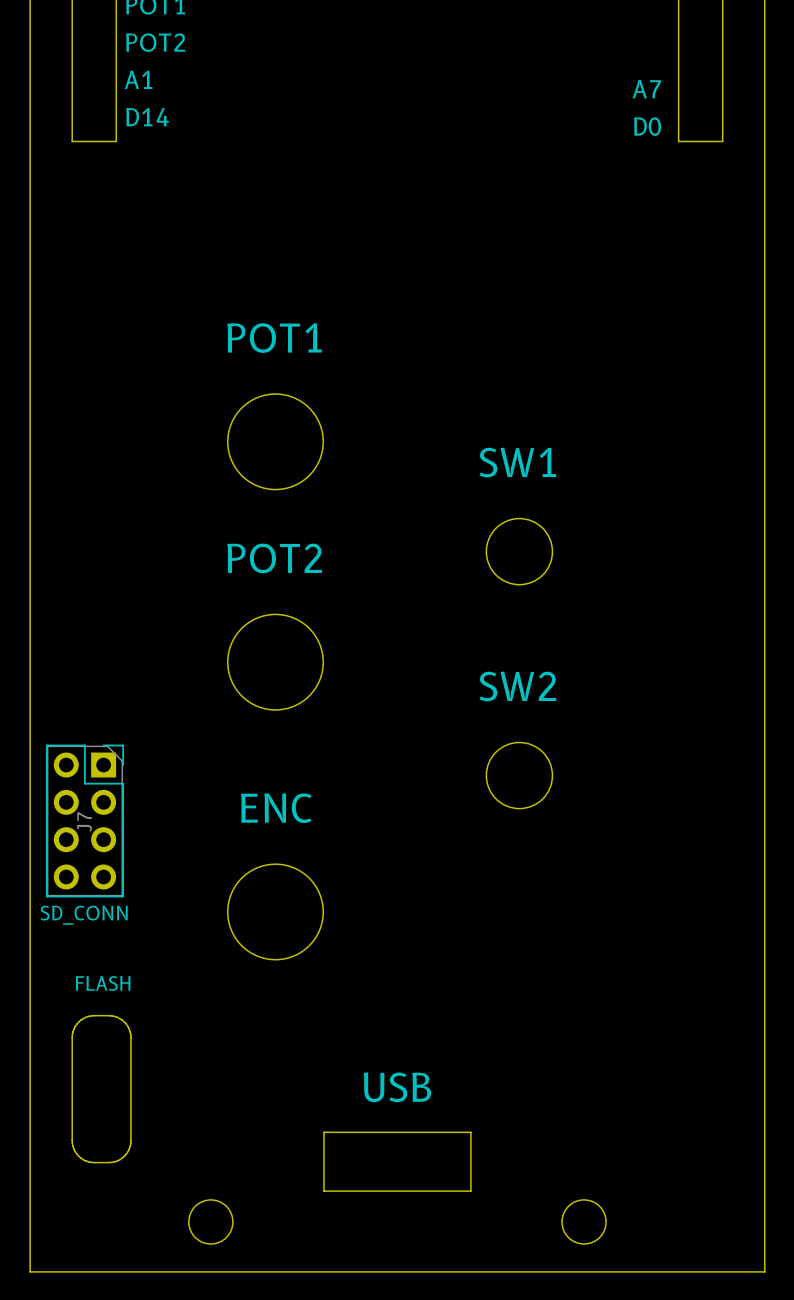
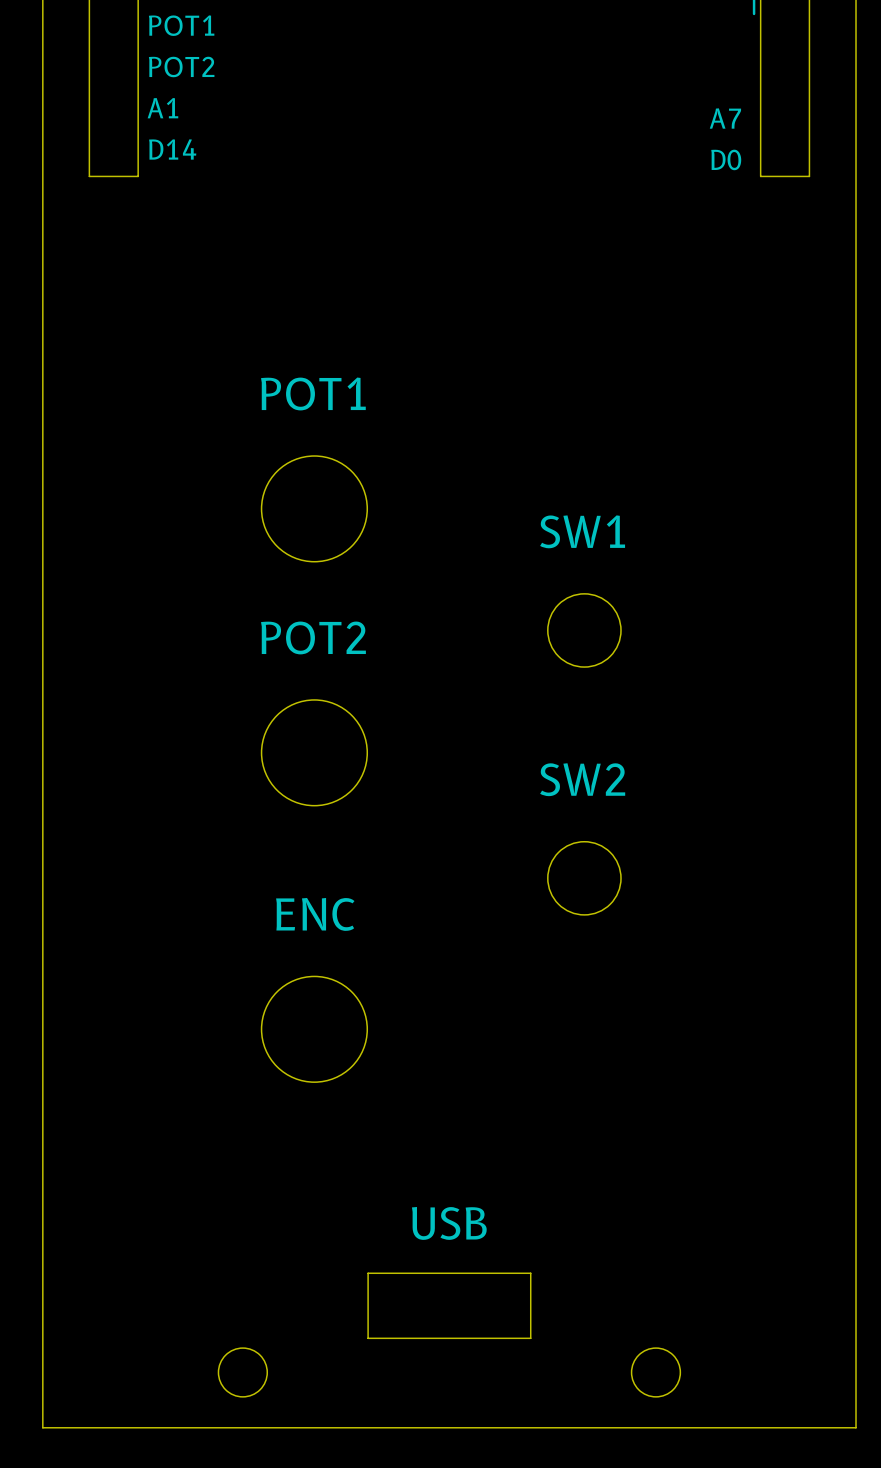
J7: SD_CONN (84, 821) -> none
text: FLASH (103, 983) -> none
board edge: (94, 1015) (85, 1017) (78, 1022) (72, 1034) (72, 1143) (76, 1153) (85, 1160) (111, 1162) (124, 1156) (130, 1143) (130, 1034) (126, 1024) (119, 1018) (111, 1015) (94, 1015) -> none

